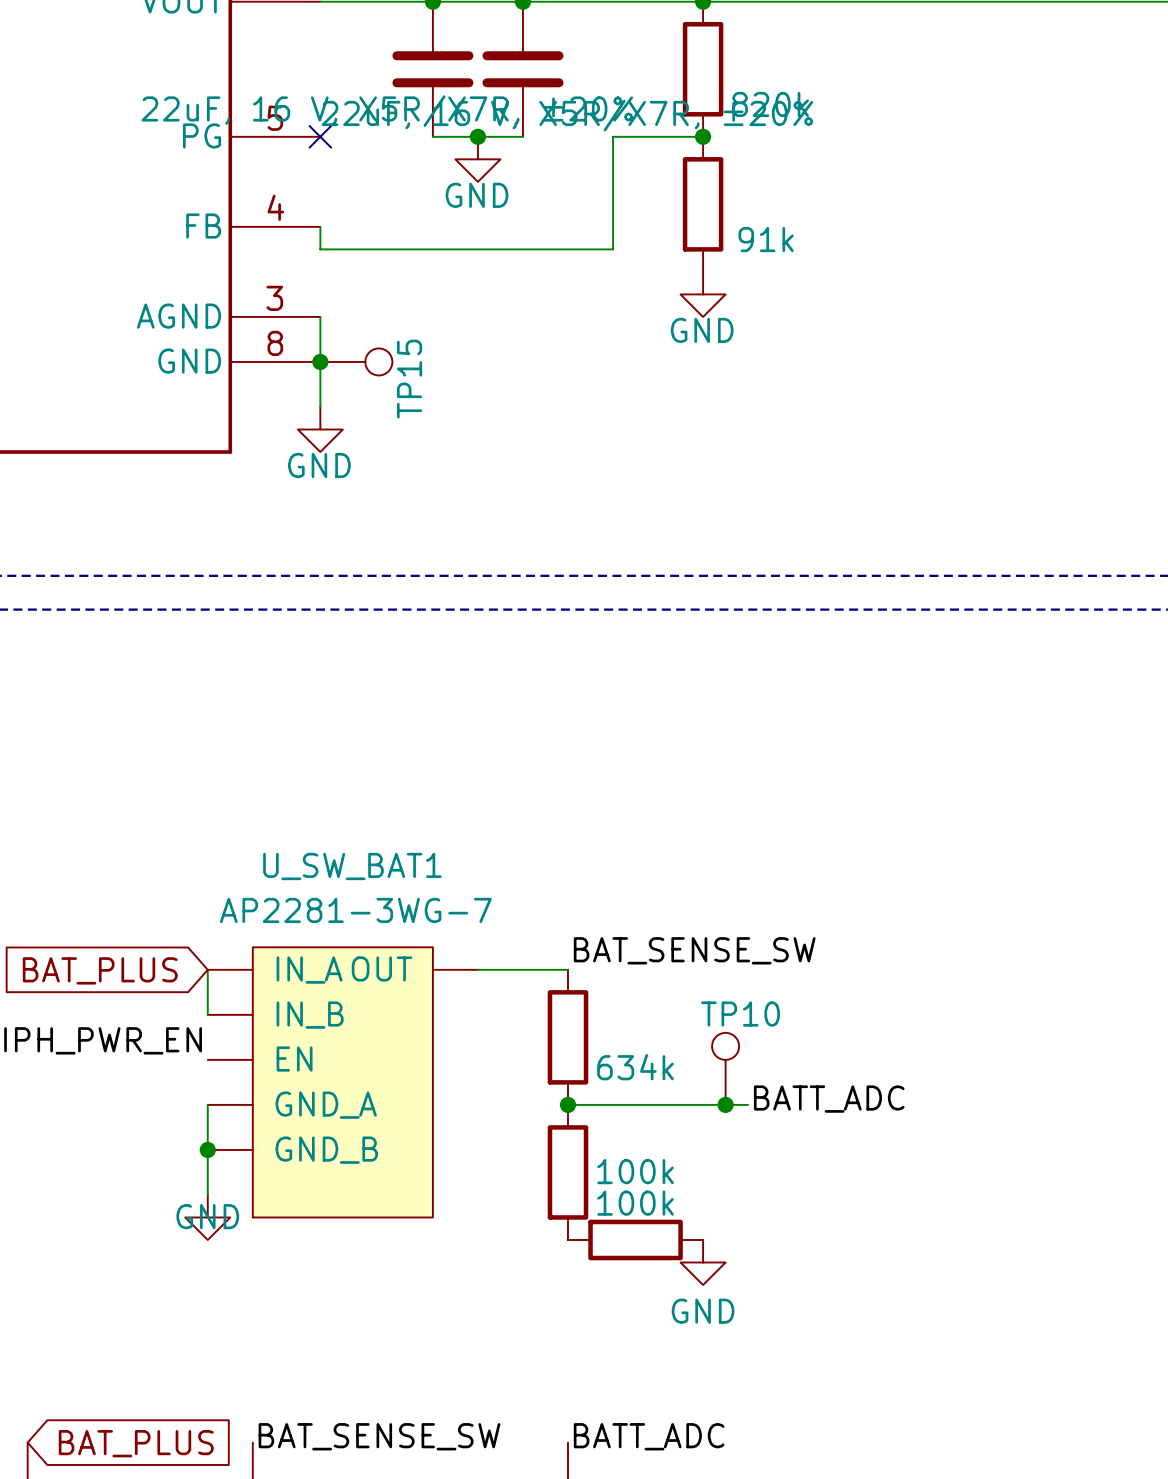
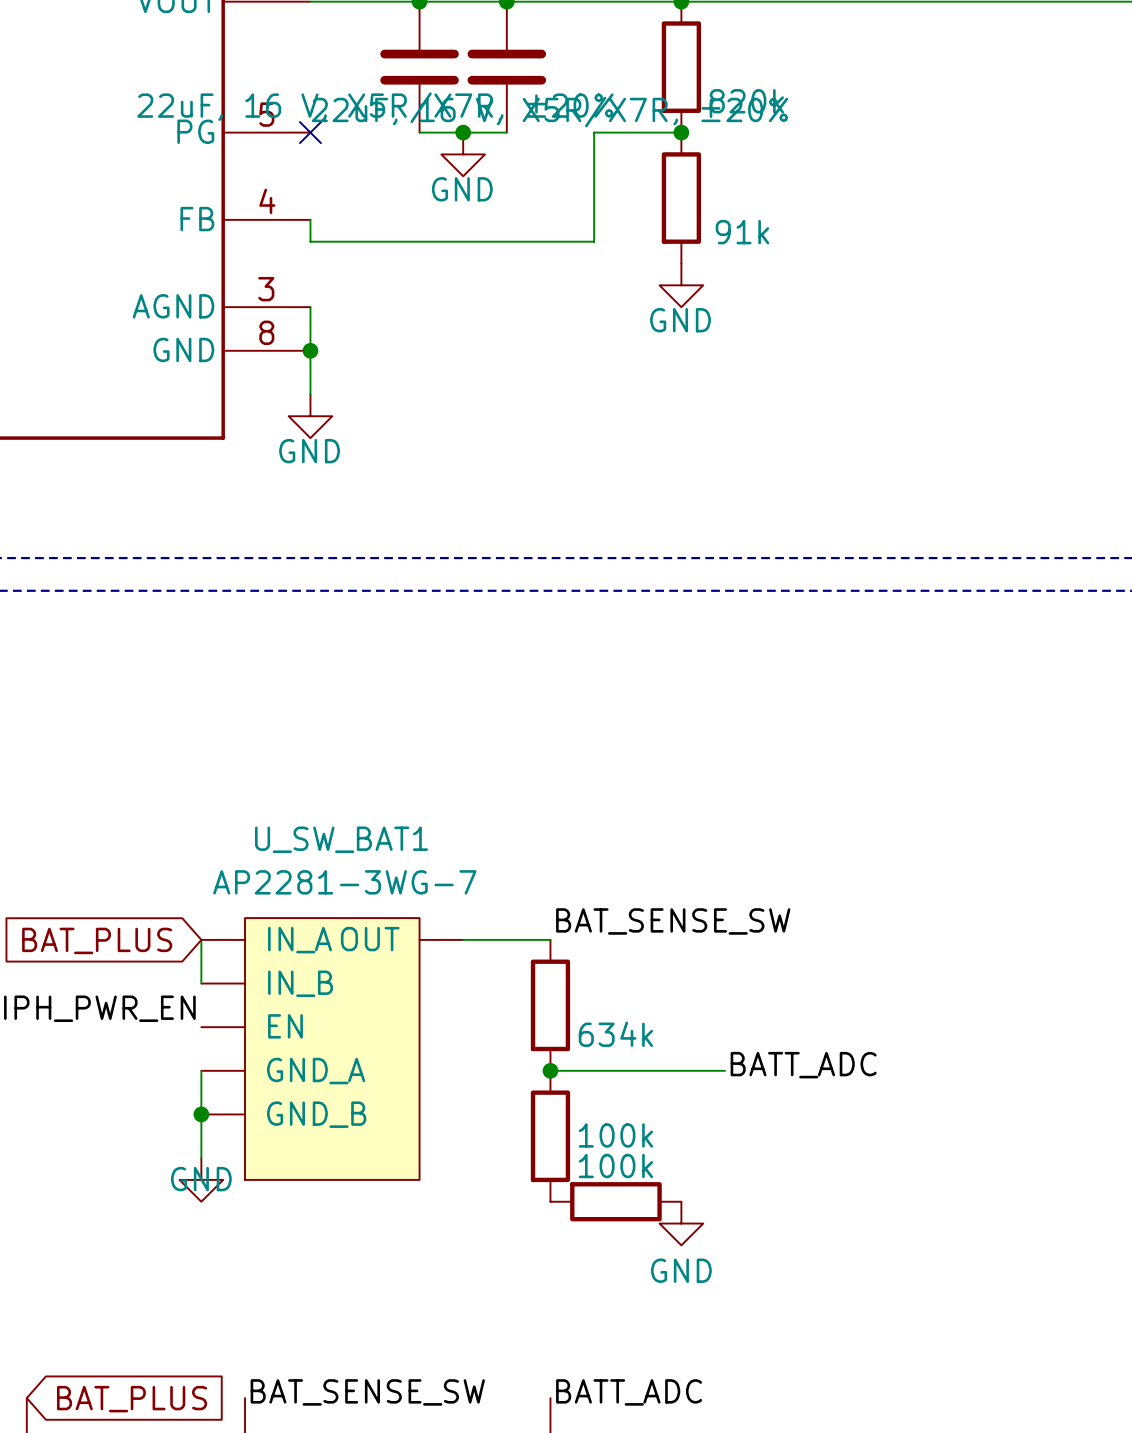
TP15: (356, 361) -> none
TP10: (725, 1068) -> none
junction: (725, 1104) -> none

